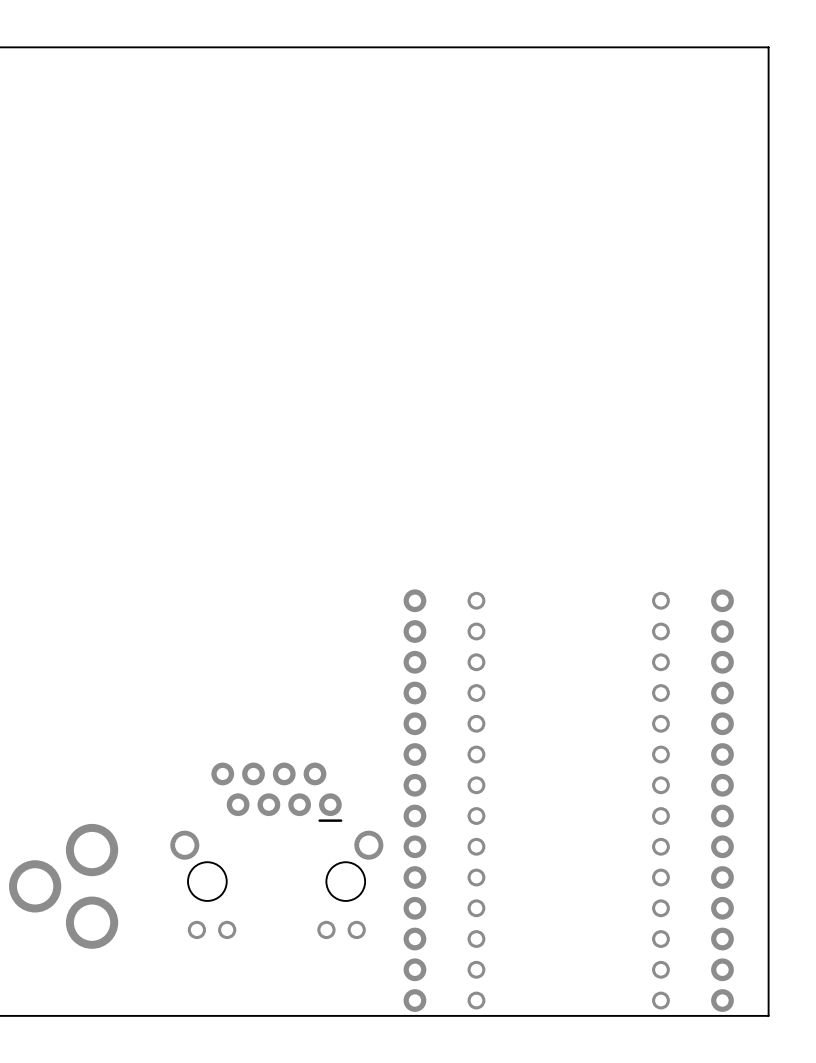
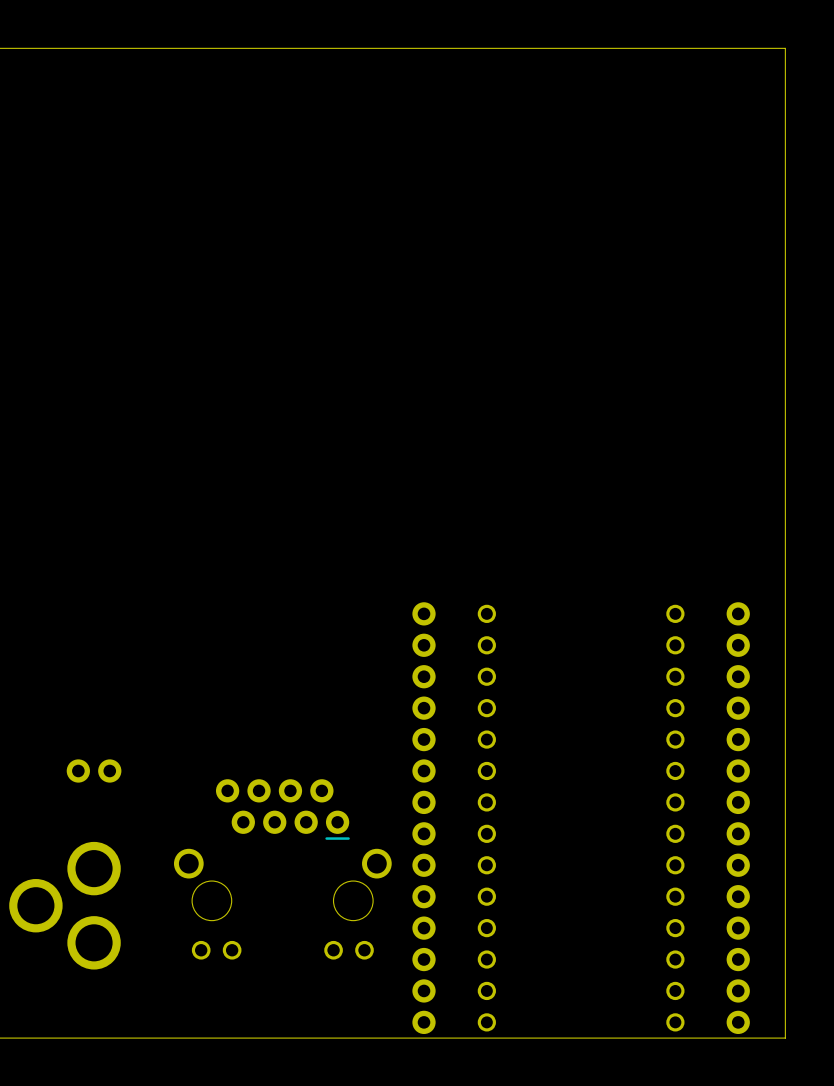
part: none -> (94, 770)

